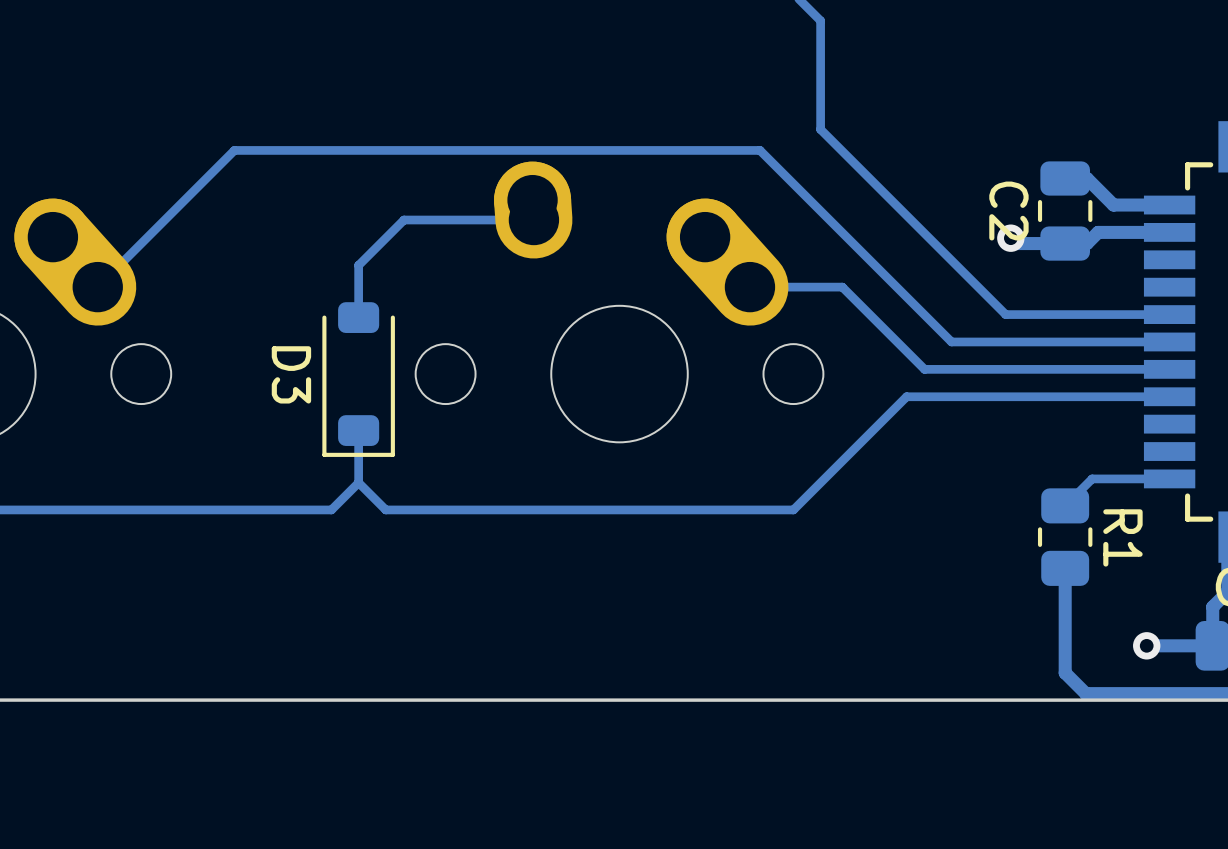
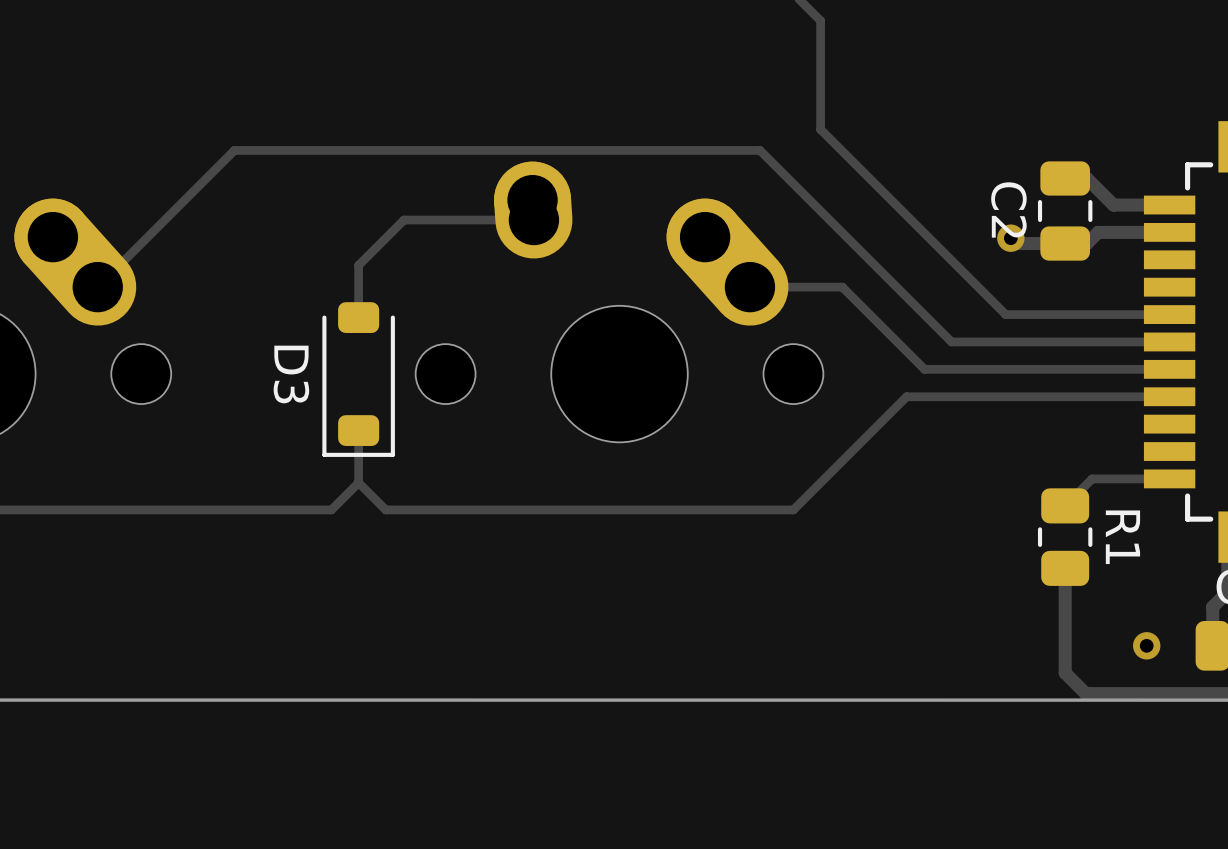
track: (1212, 645) (1146, 645) -> none

